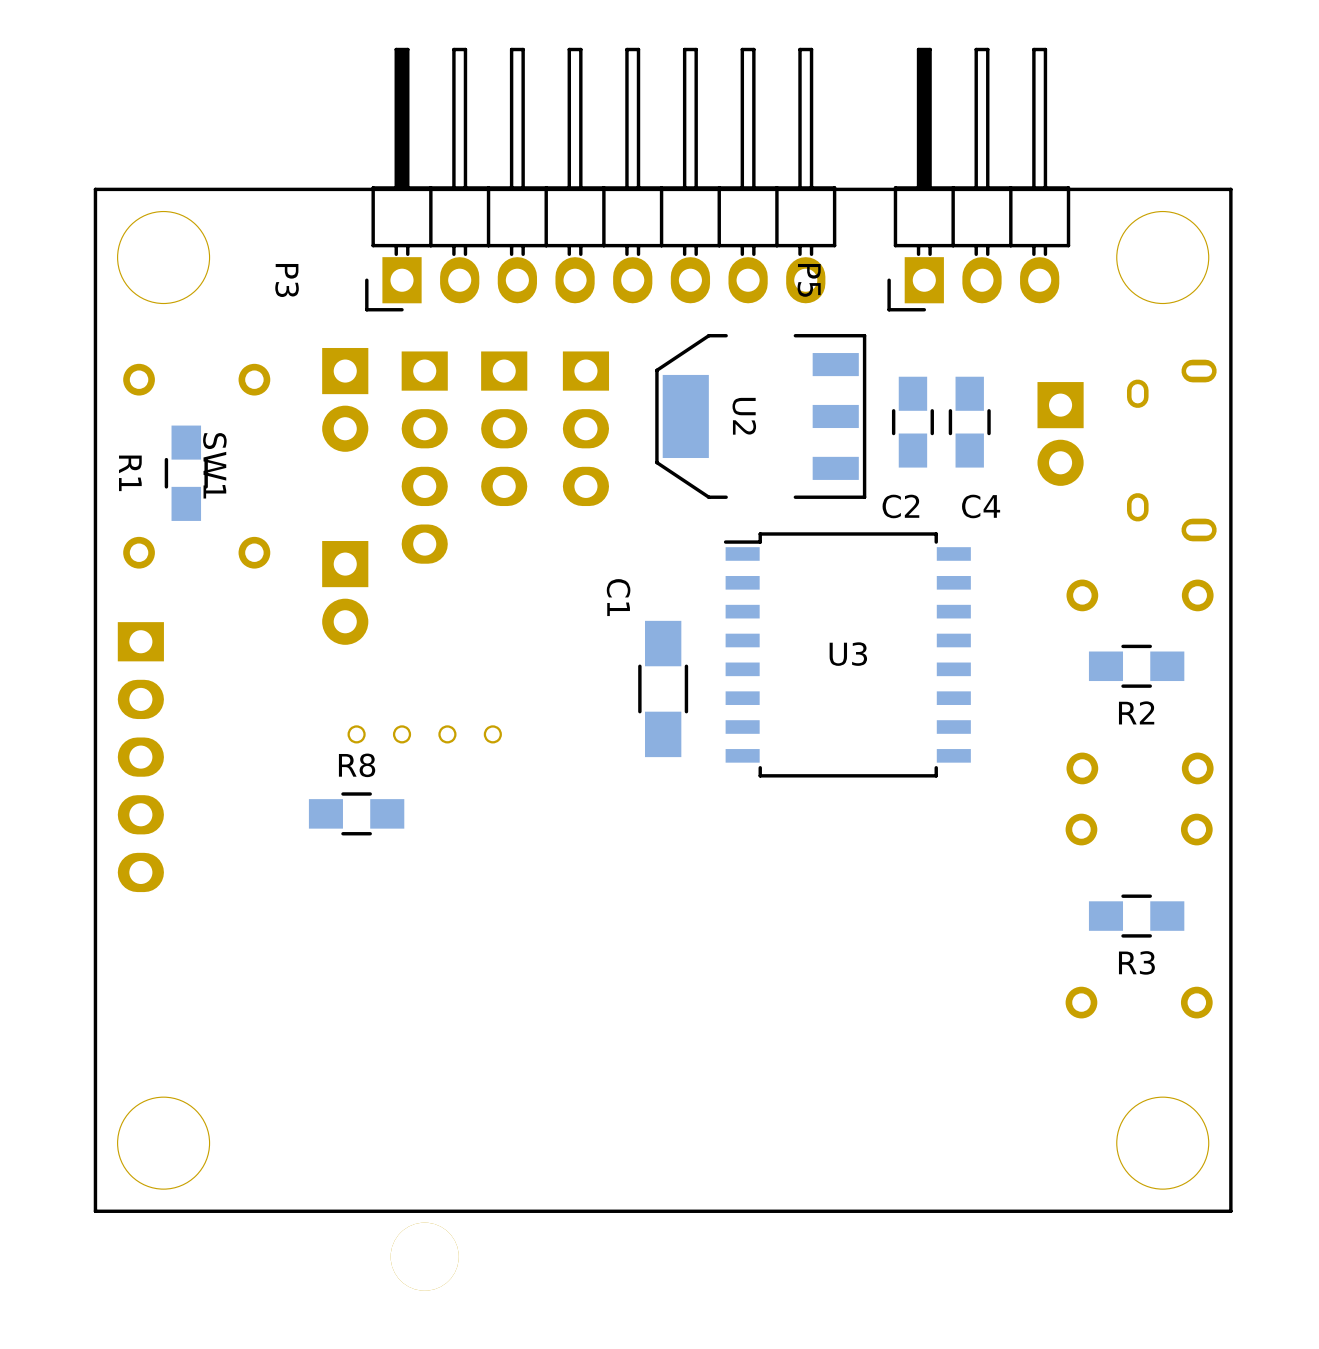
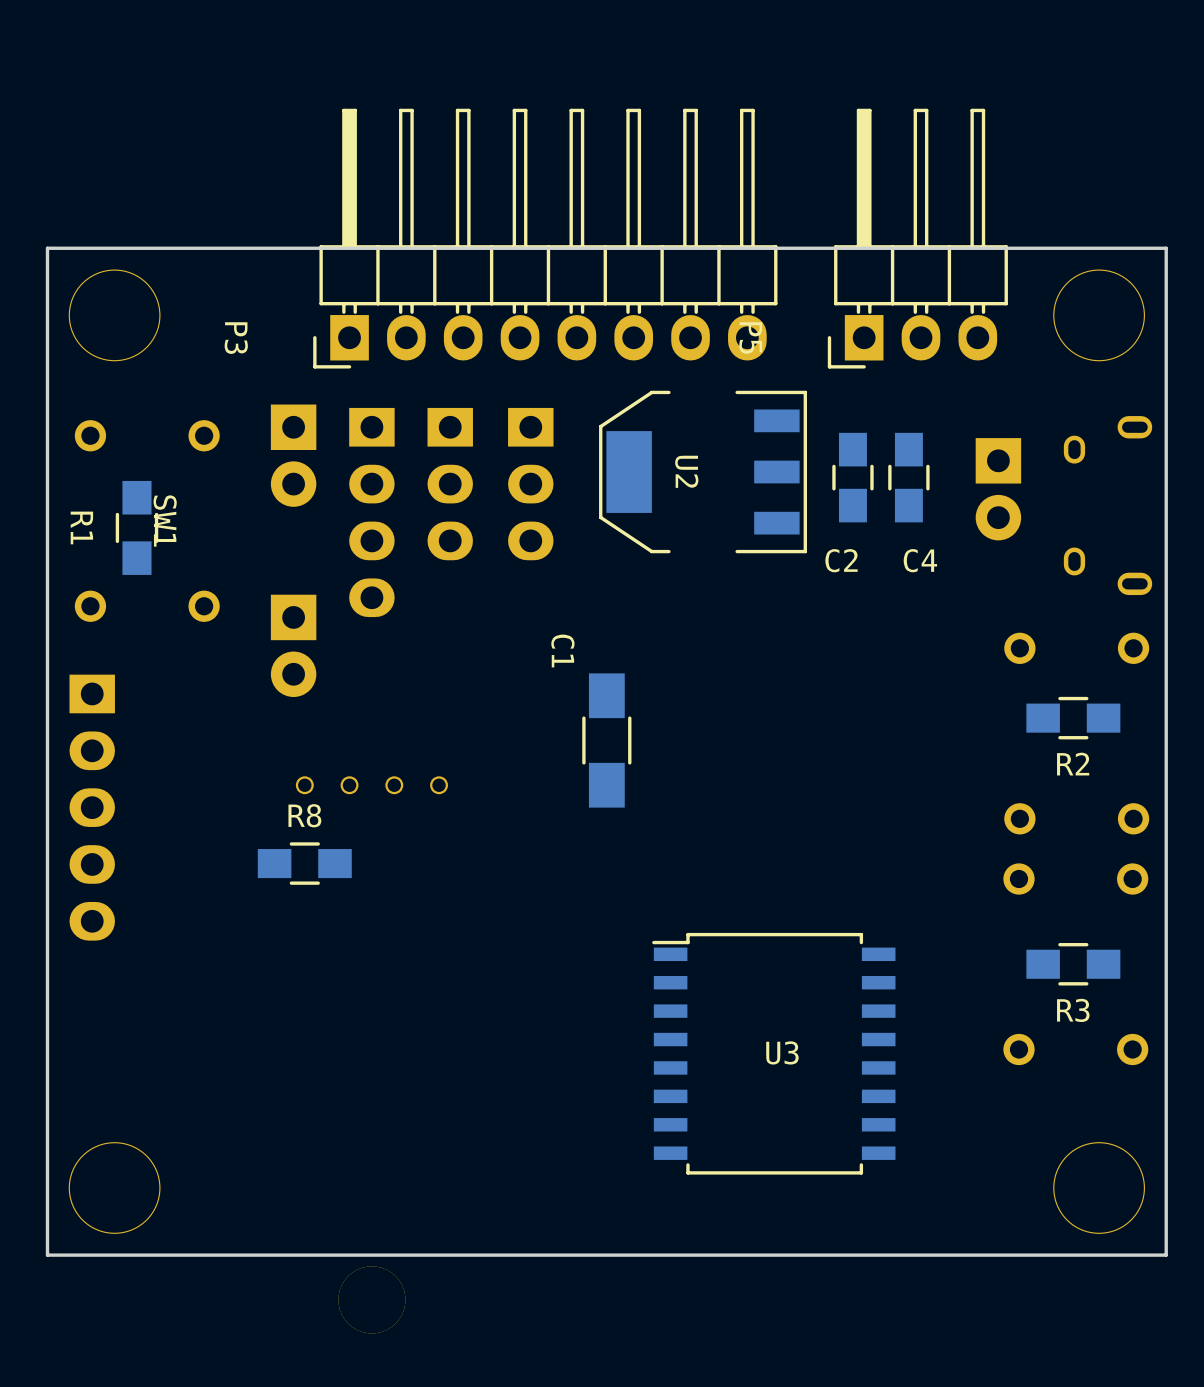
U3 position: (847, 654) -> (773, 1053)
U3 name position: U3 (848, 654) -> U3 (782, 1052)

